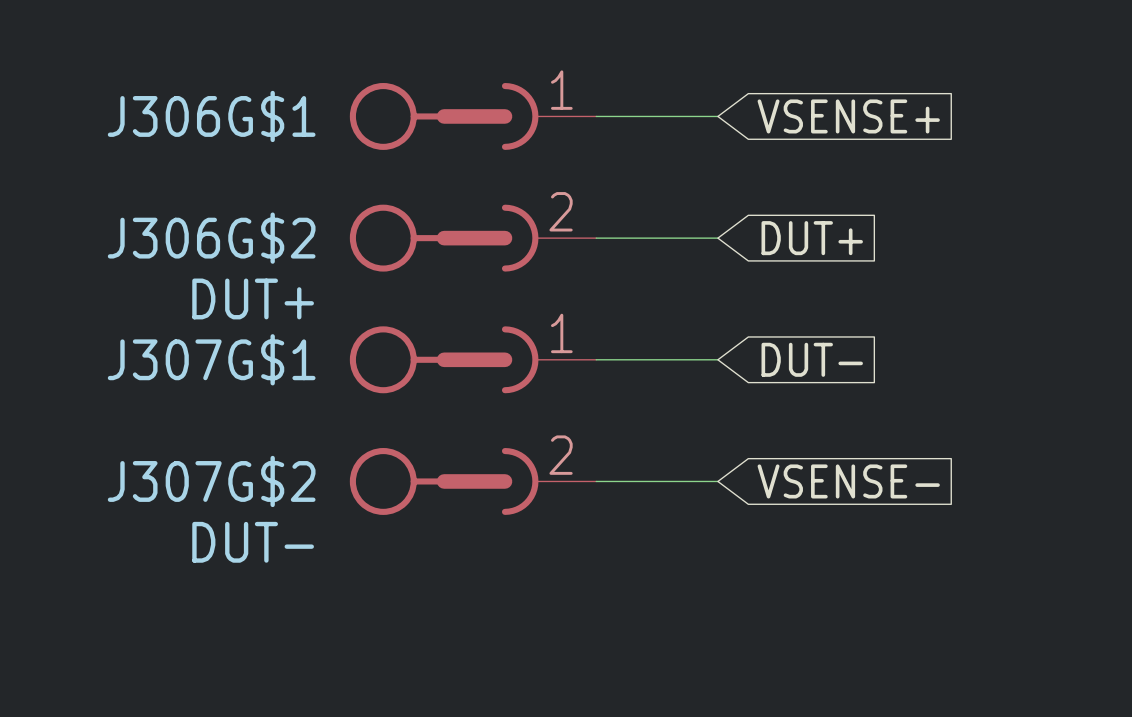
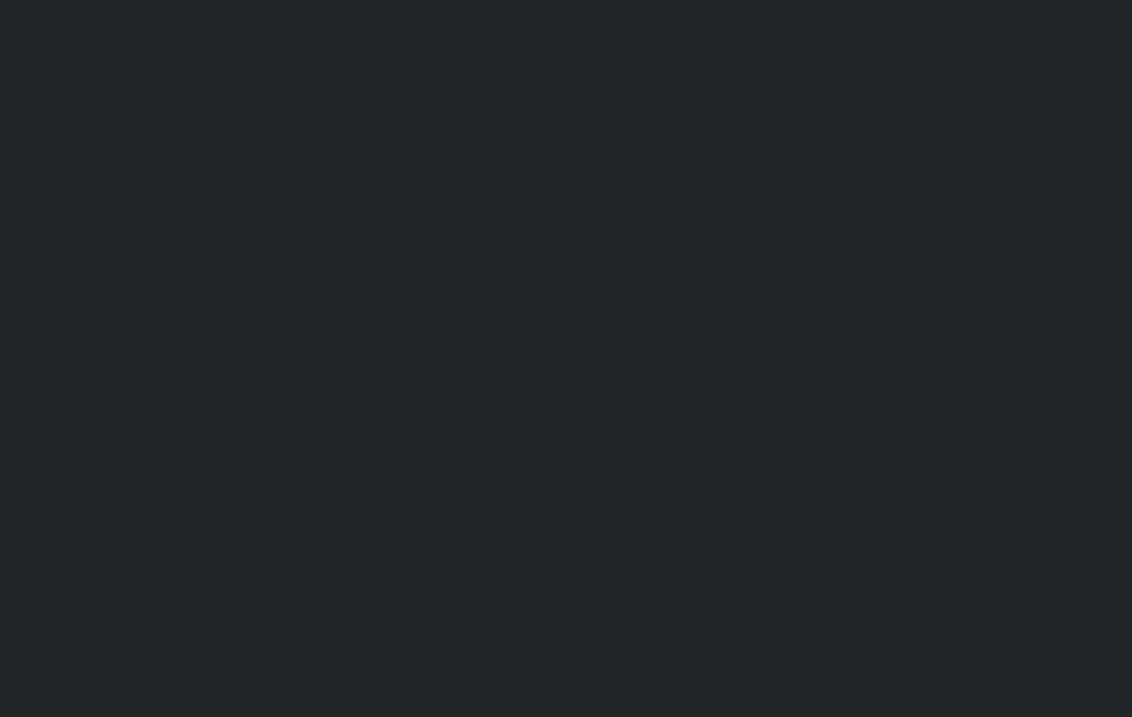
J306G$1: (473, 116) -> none
wire: (596, 116) (717, 116) -> none
global label: VSENSE+ (848, 116) -> none
J306G$2: DUT+ (473, 238) -> none
wire: (596, 238) (717, 238) -> none
global label: DUT+ (812, 238) -> none
J307G$1: (473, 359) -> none
wire: (596, 359) (717, 359) -> none
global label: DUT- (812, 359) -> none
J307G$2: DUT- (473, 481) -> none
wire: (596, 481) (717, 481) -> none
global label: VSENSE- (848, 481) -> none

